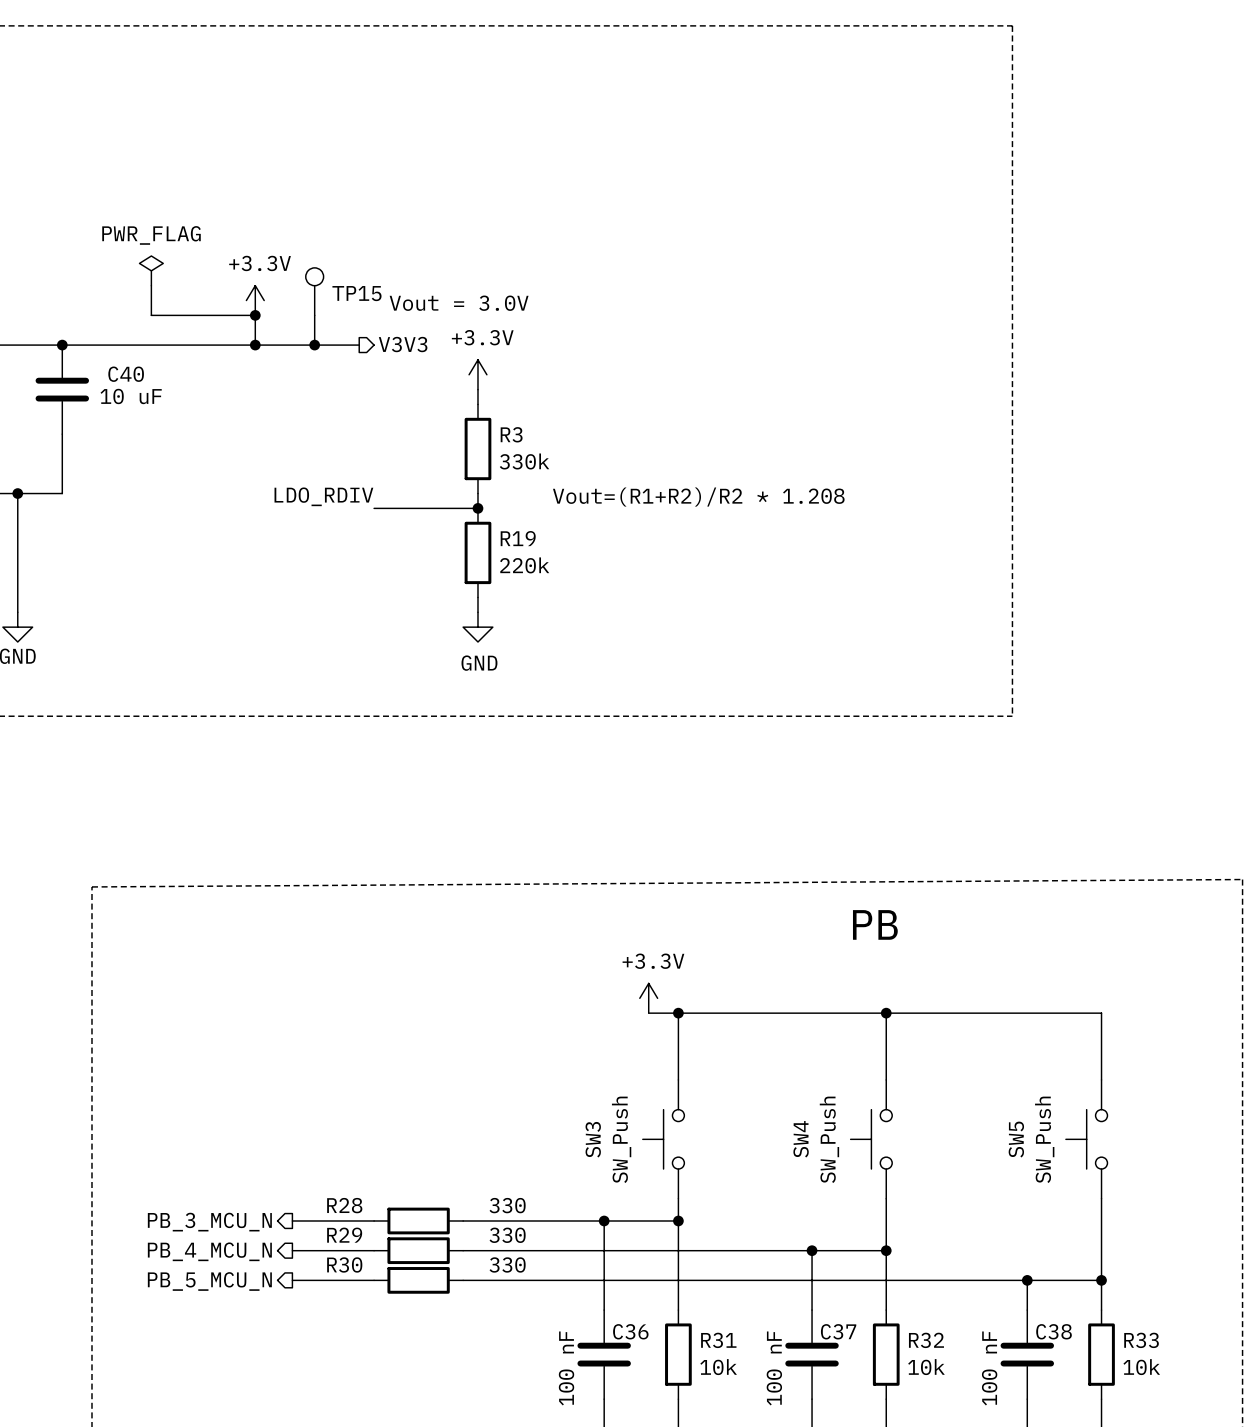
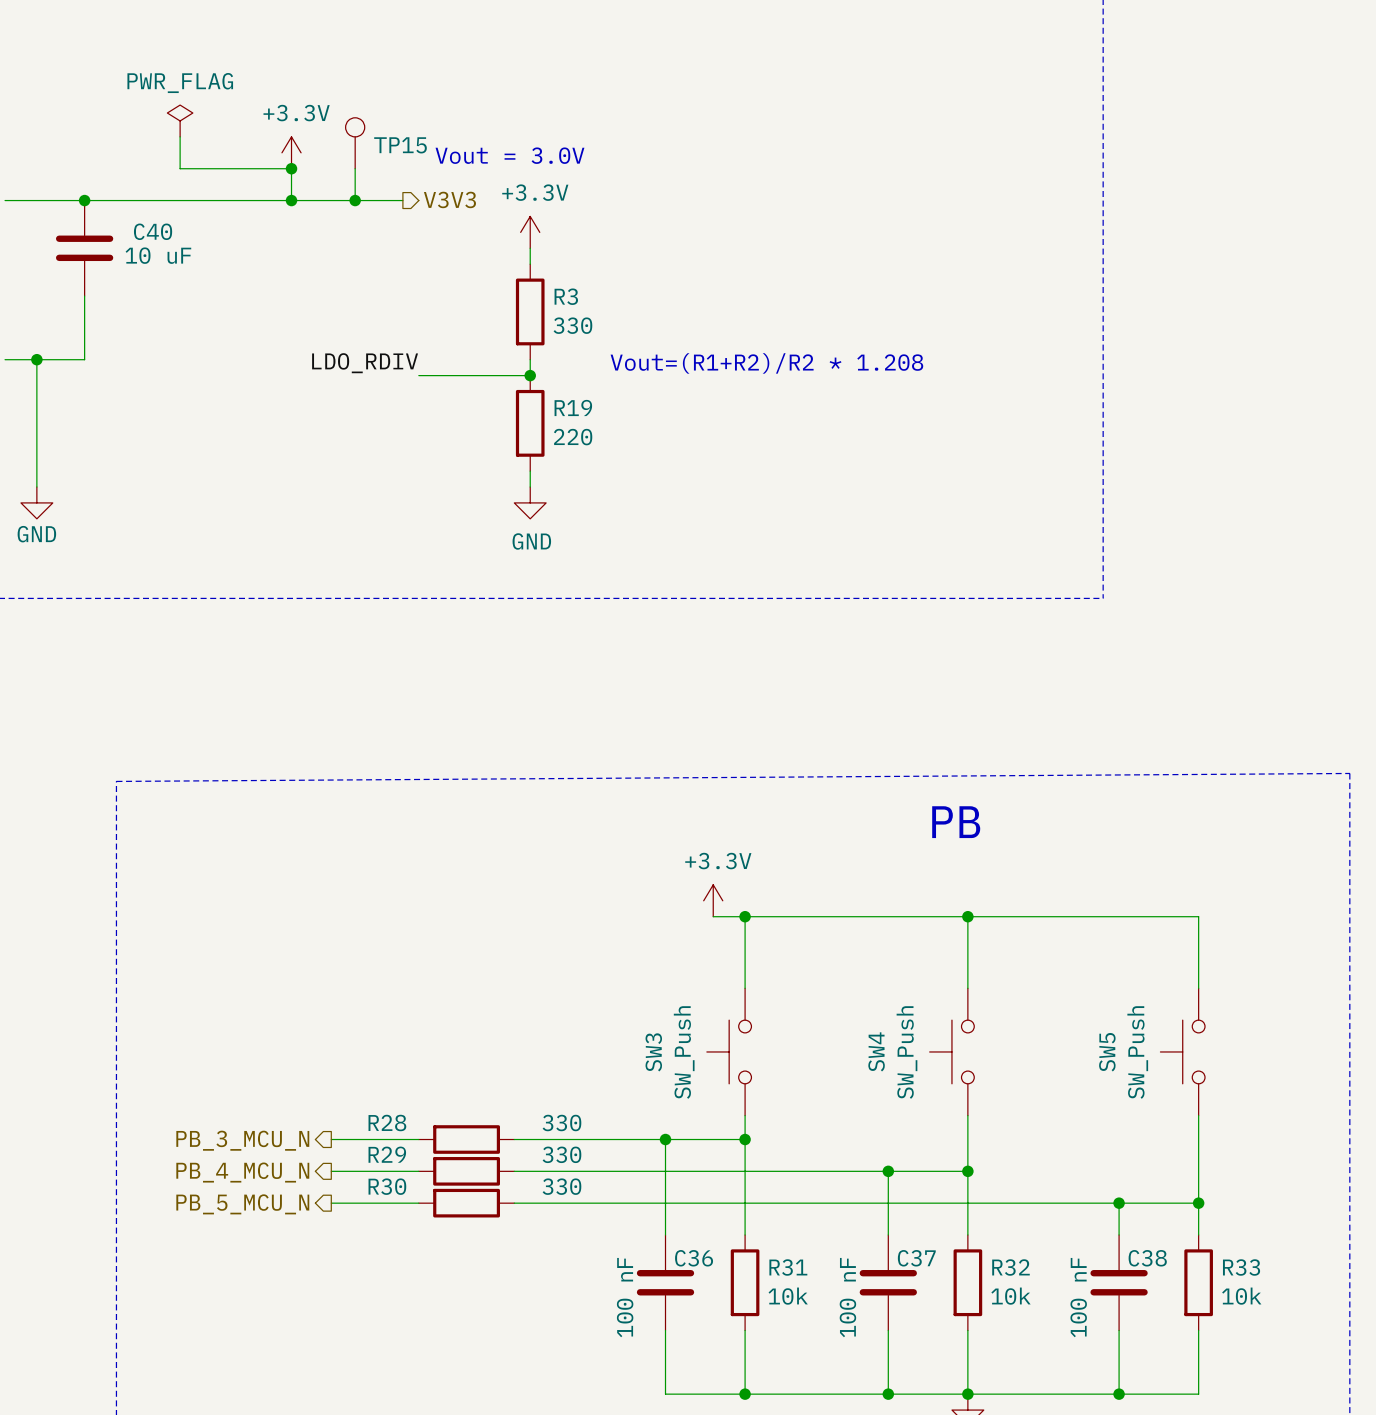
R3 value: 330k (524, 461) -> 330 (572, 325)
R19 value: 220k (524, 565) -> 220 (573, 437)

